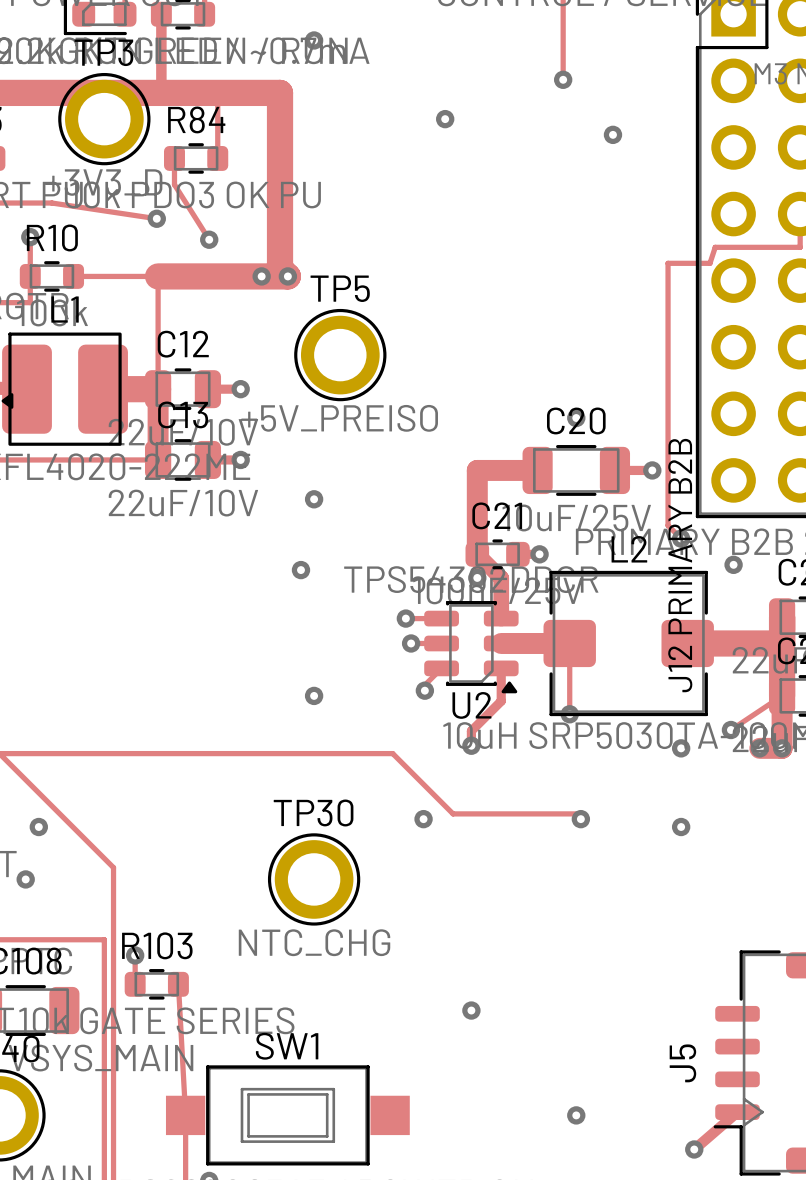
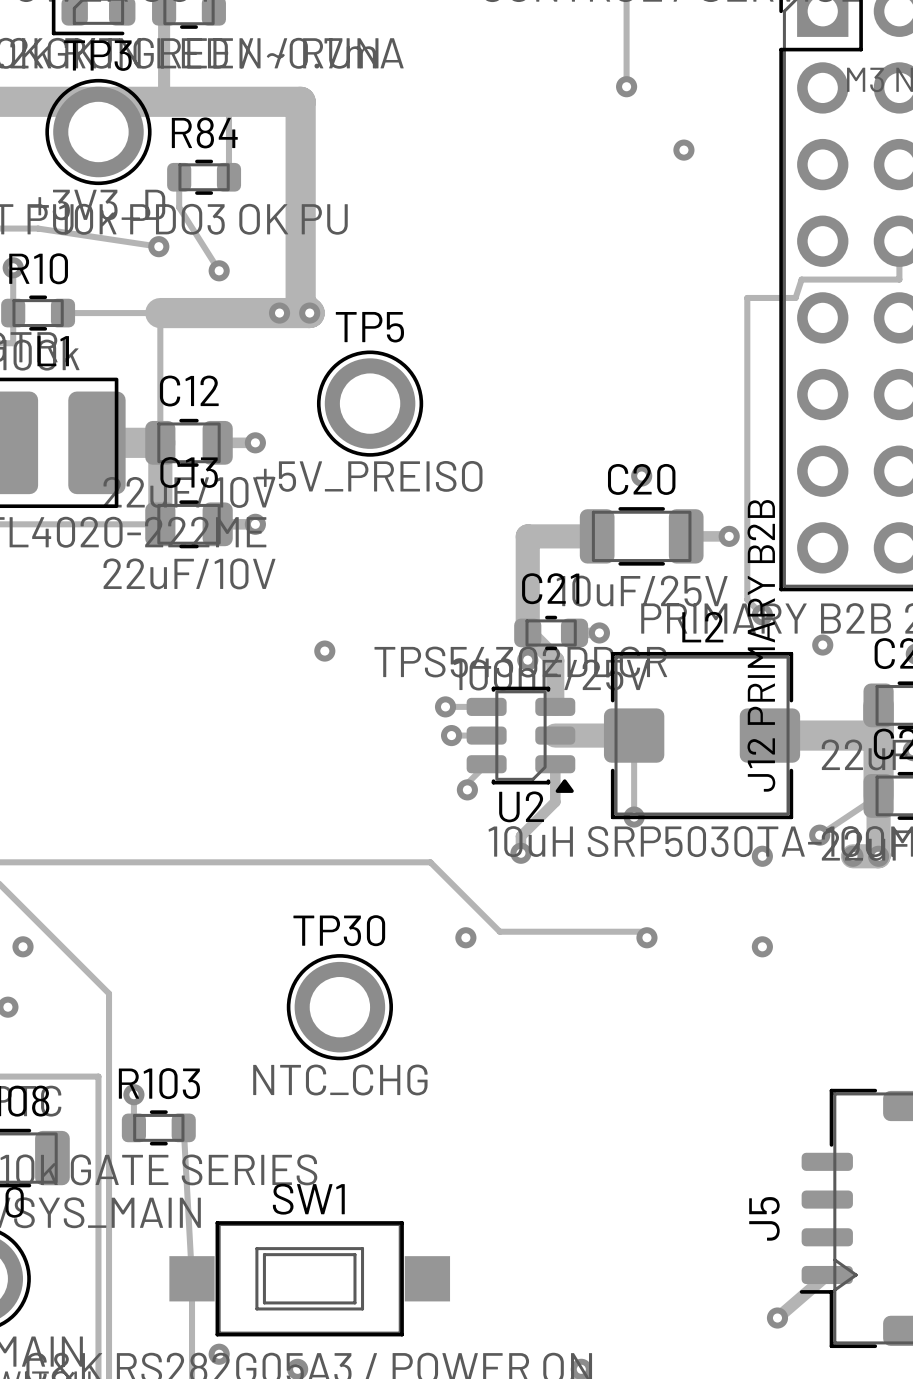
via: (314, 40) -> none
via: (445, 119) -> none
via: (314, 499) -> none
via: (314, 695) -> none
via: (471, 1010) -> none
via: (576, 1115) -> none

